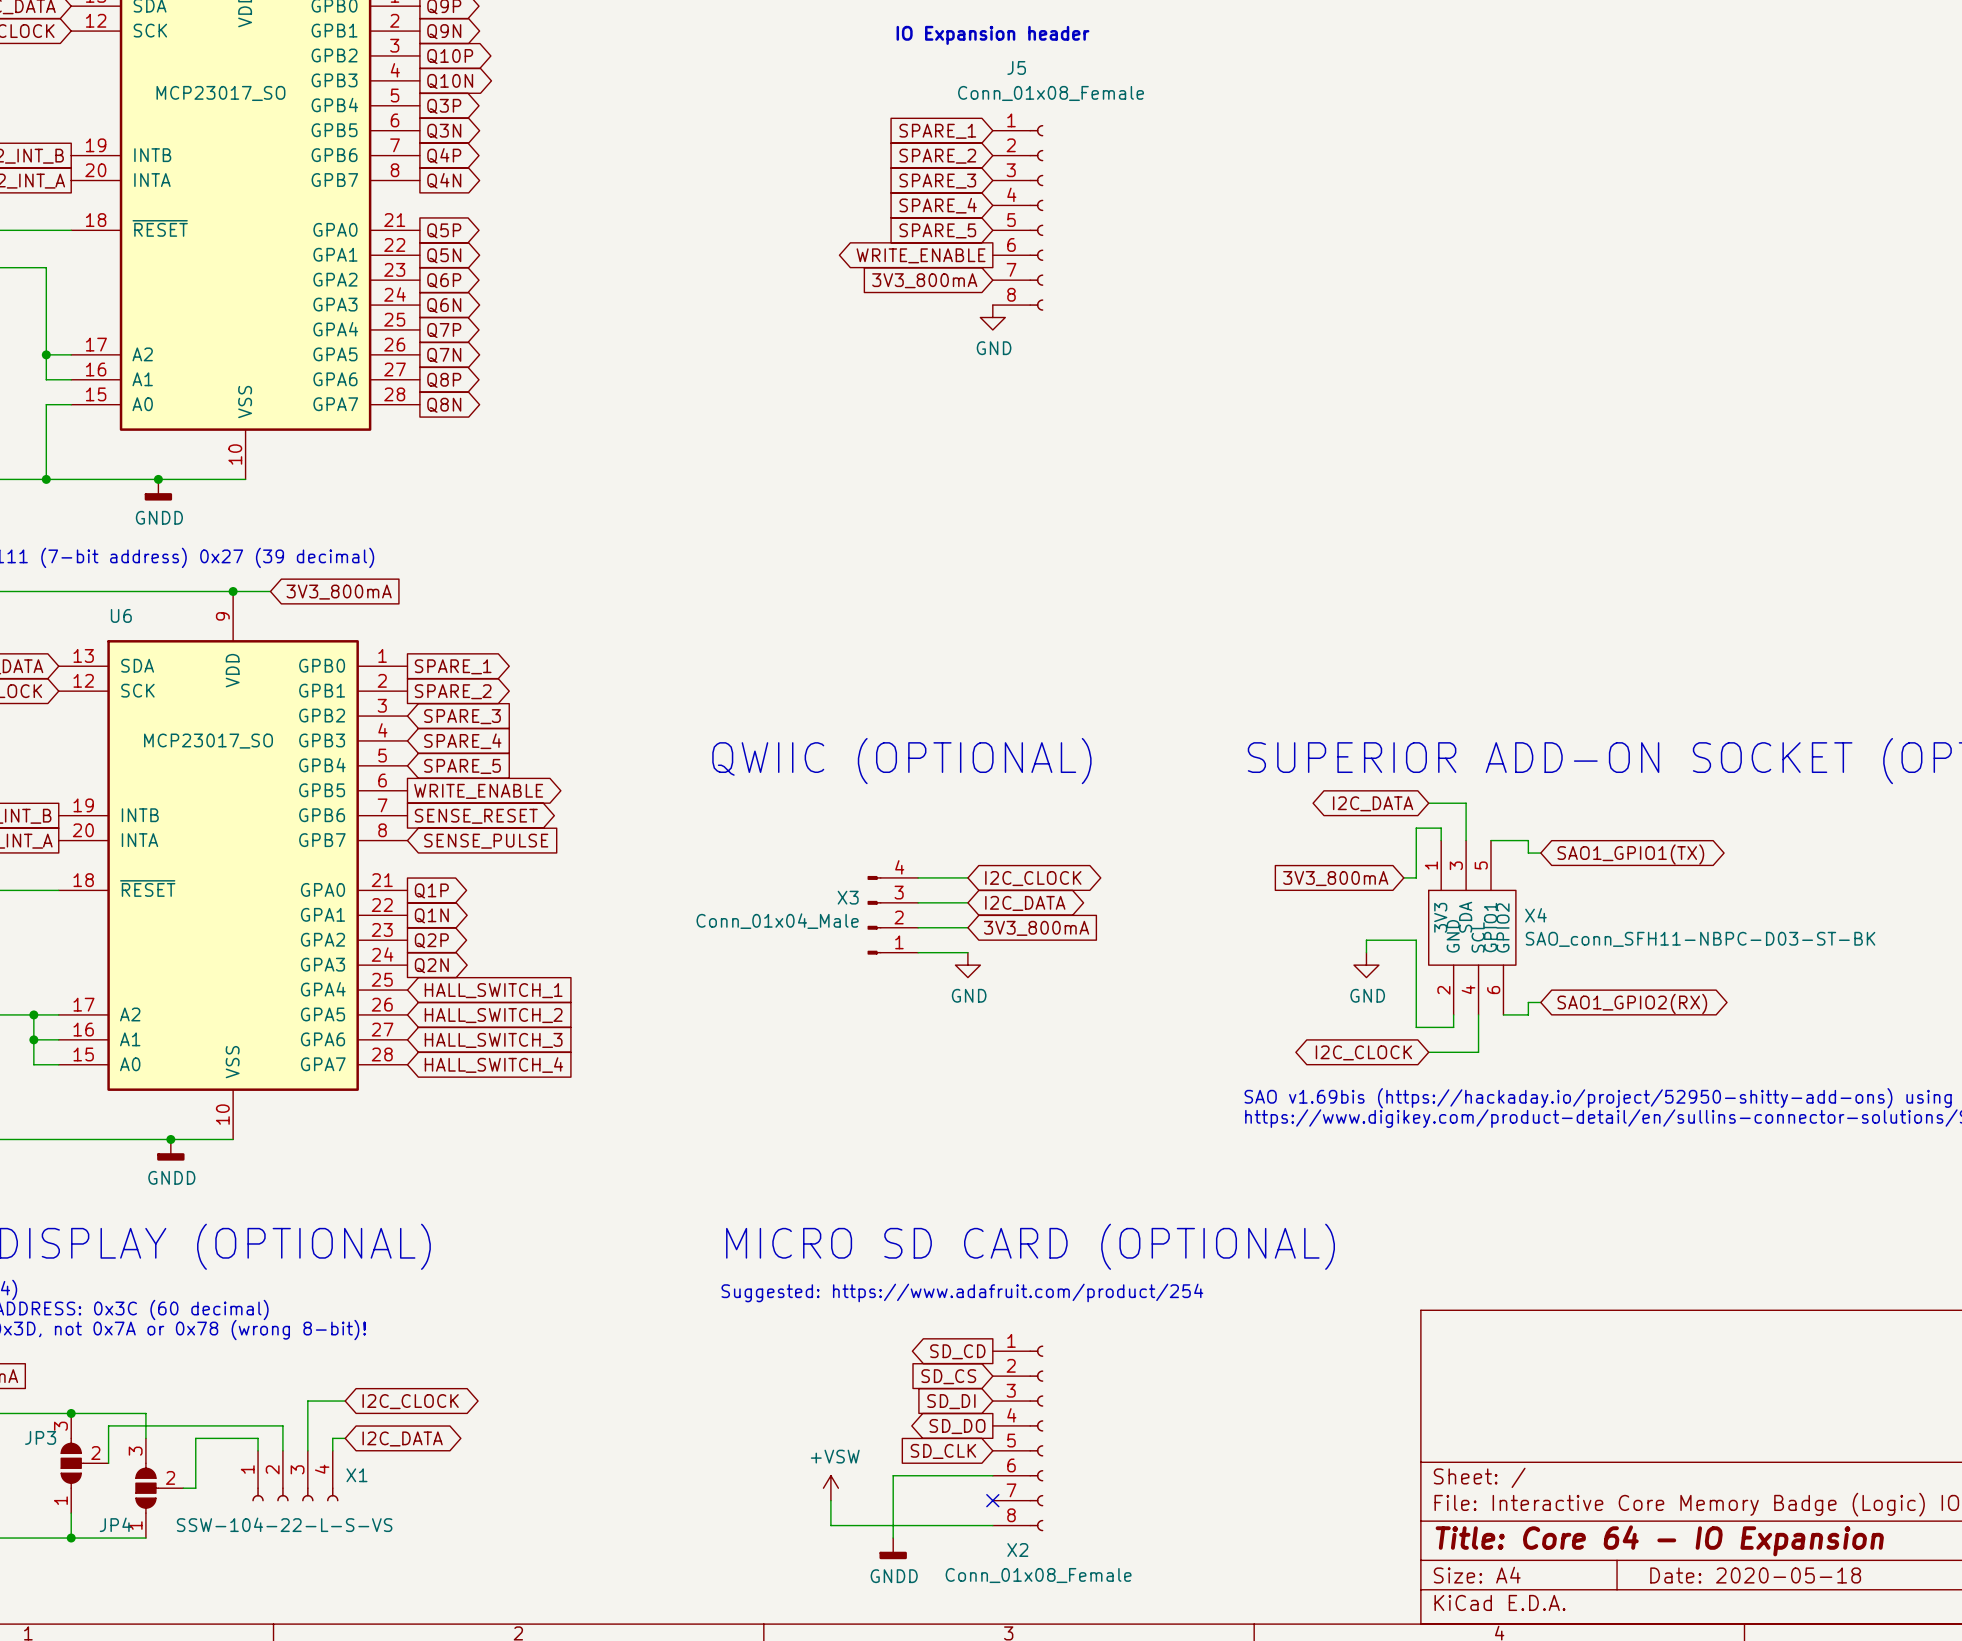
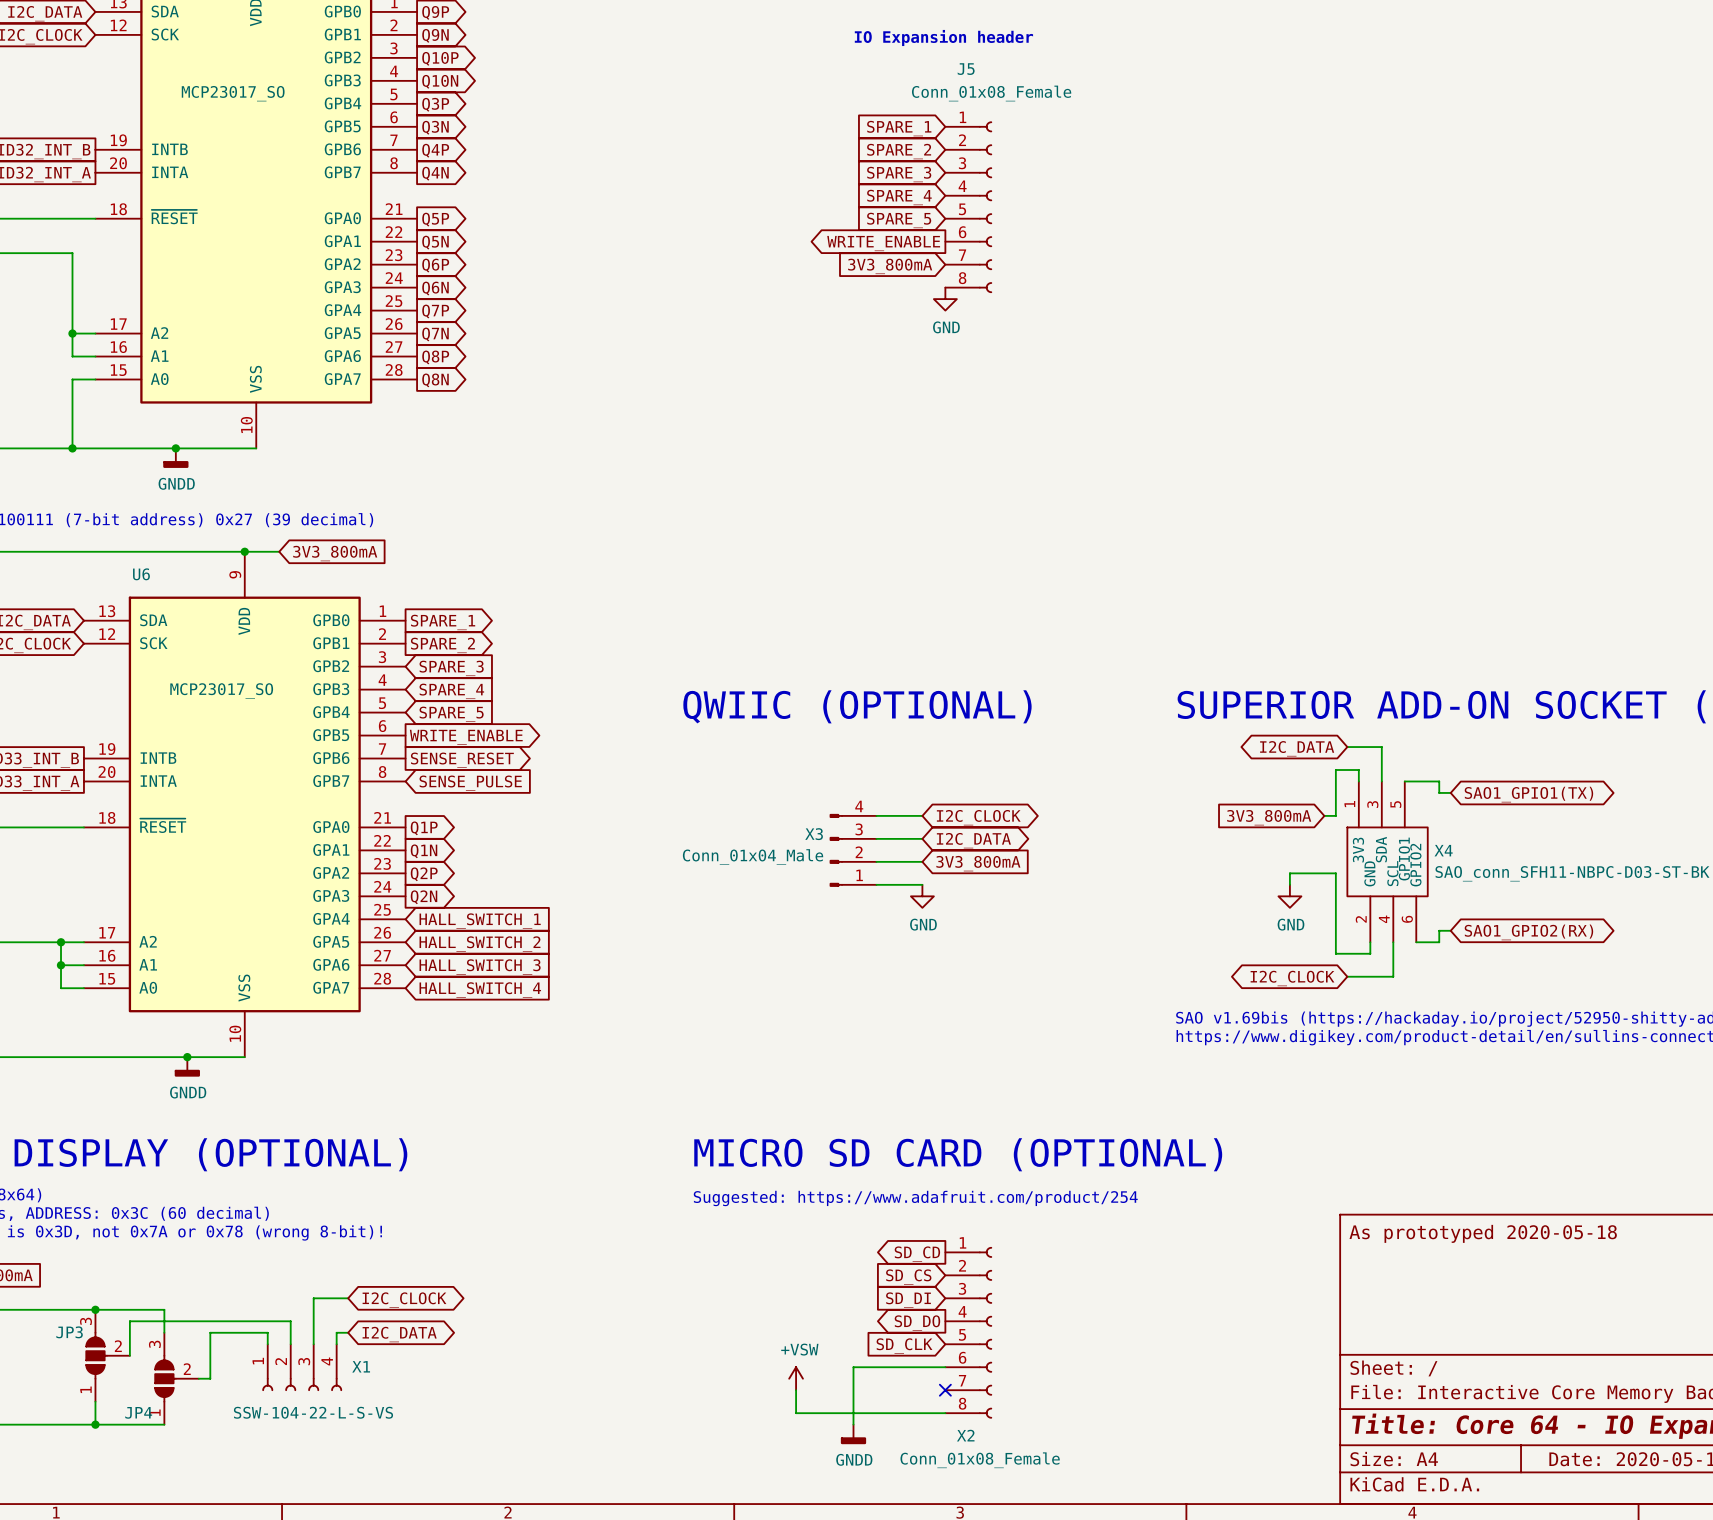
title block: none -> As prototyped 2020-05-18 (1483, 1233)

